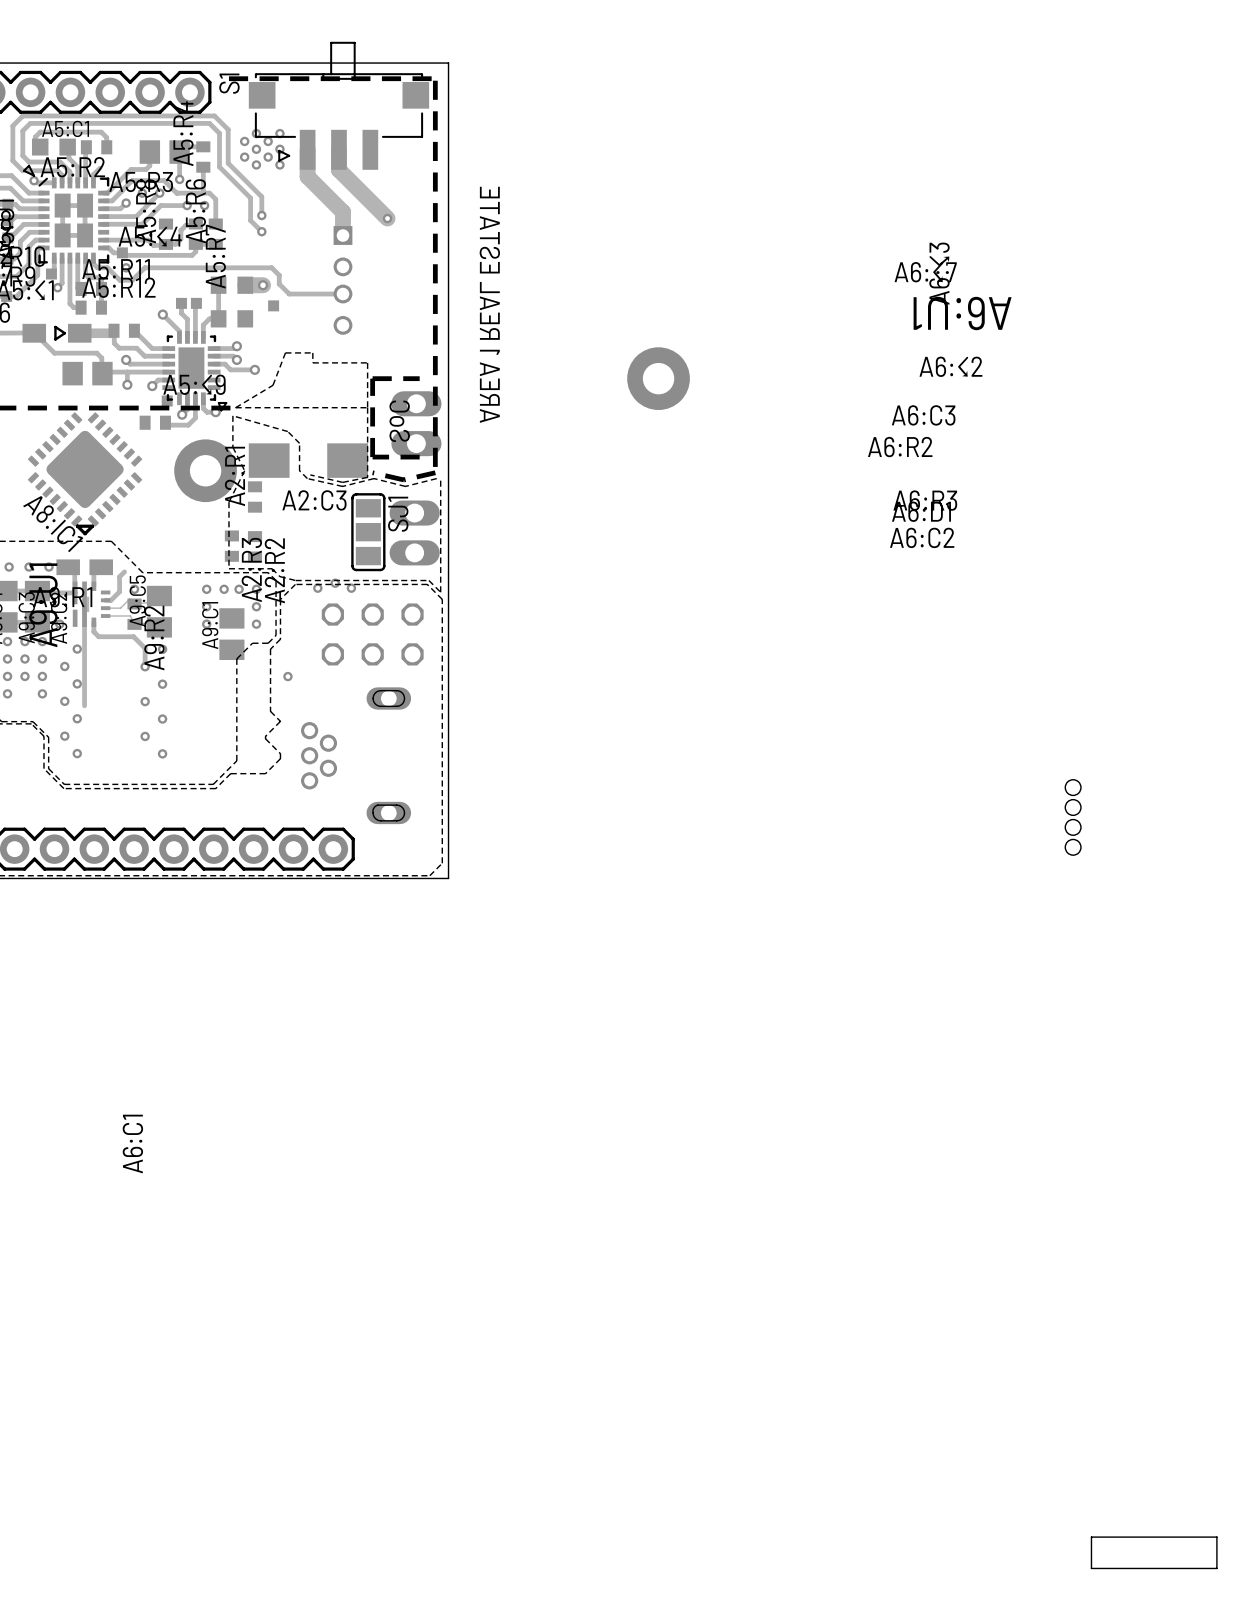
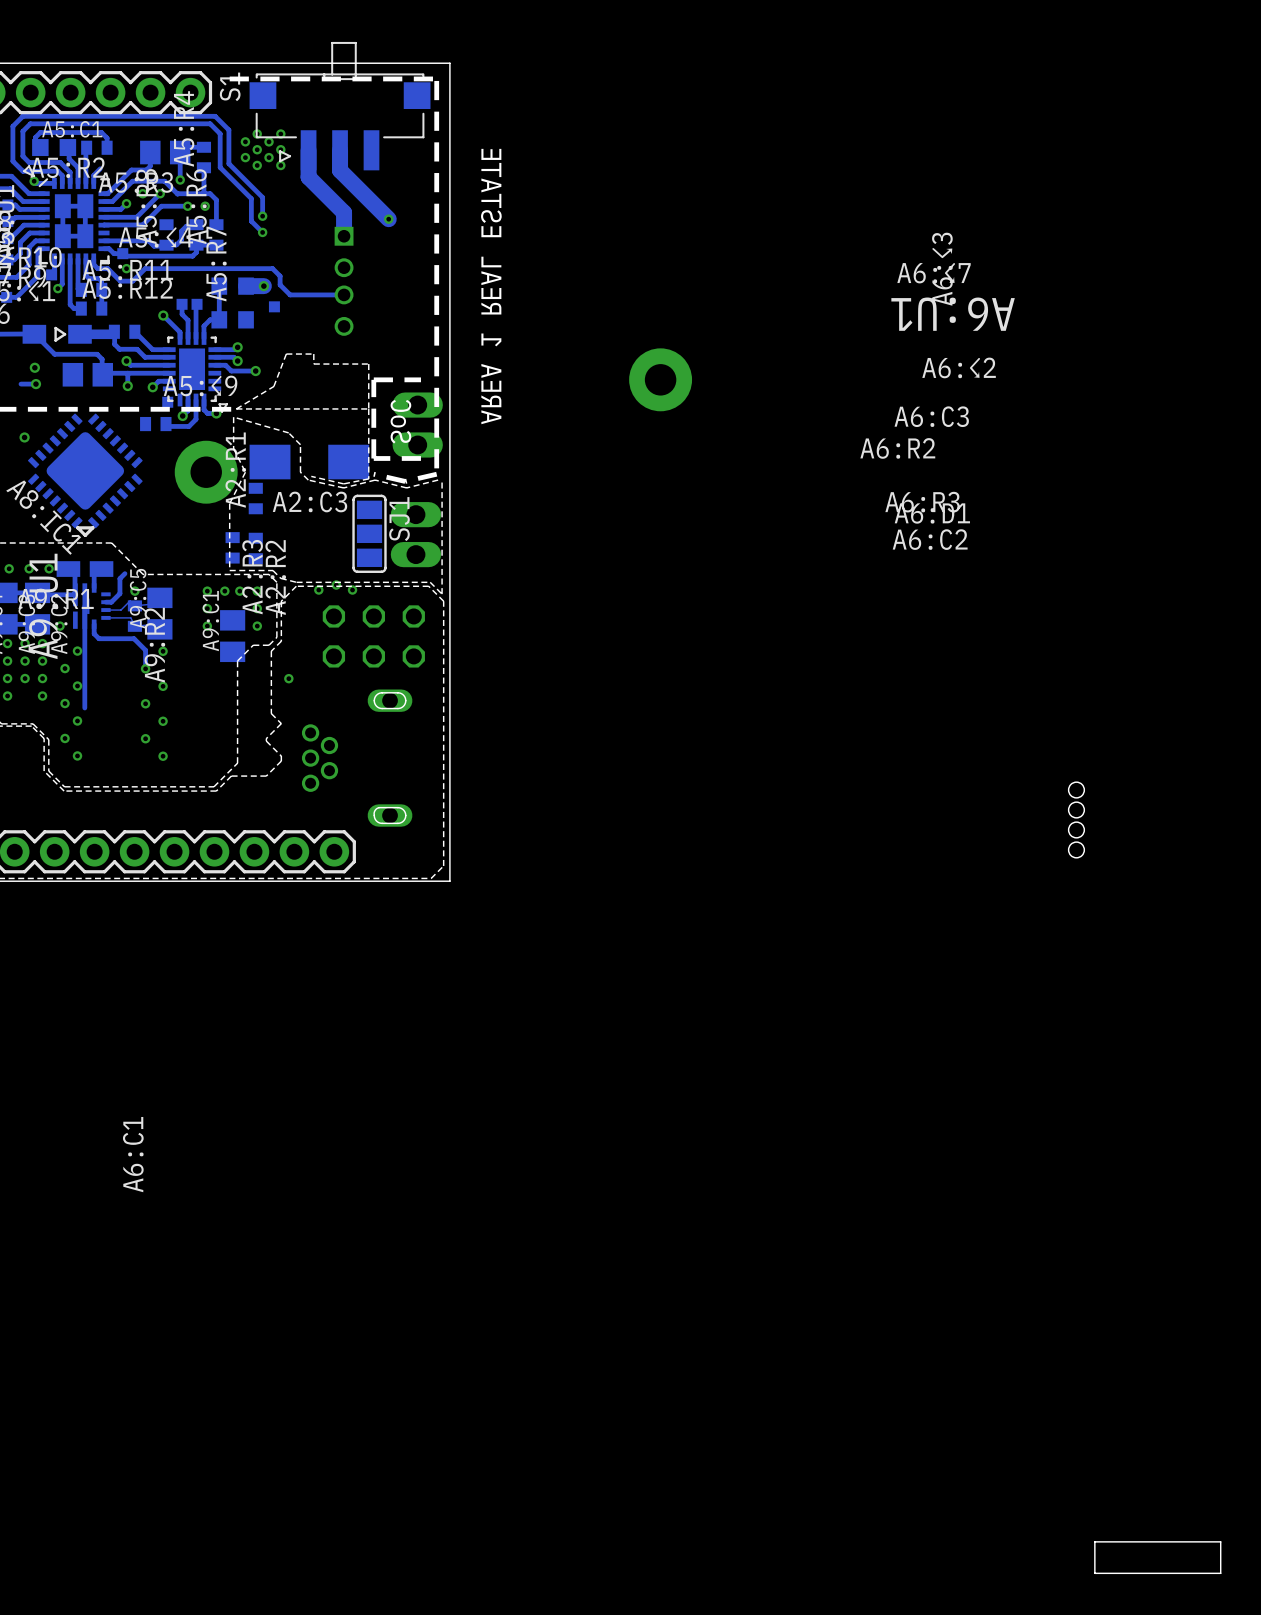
via: none -> (34, 367)
track: none -> (35, 384) (21, 384)
via: none -> (35, 384)
via: none -> (24, 437)

